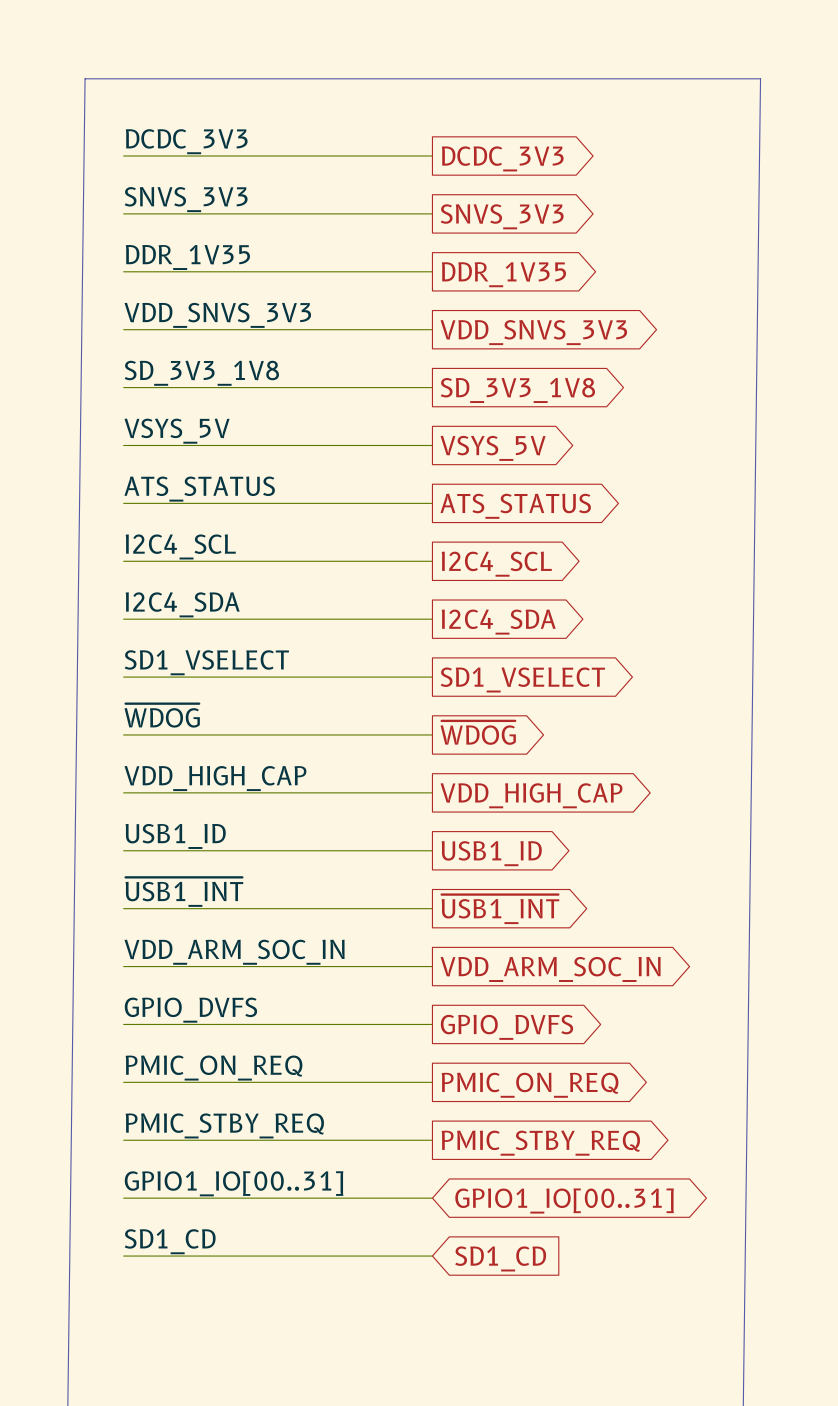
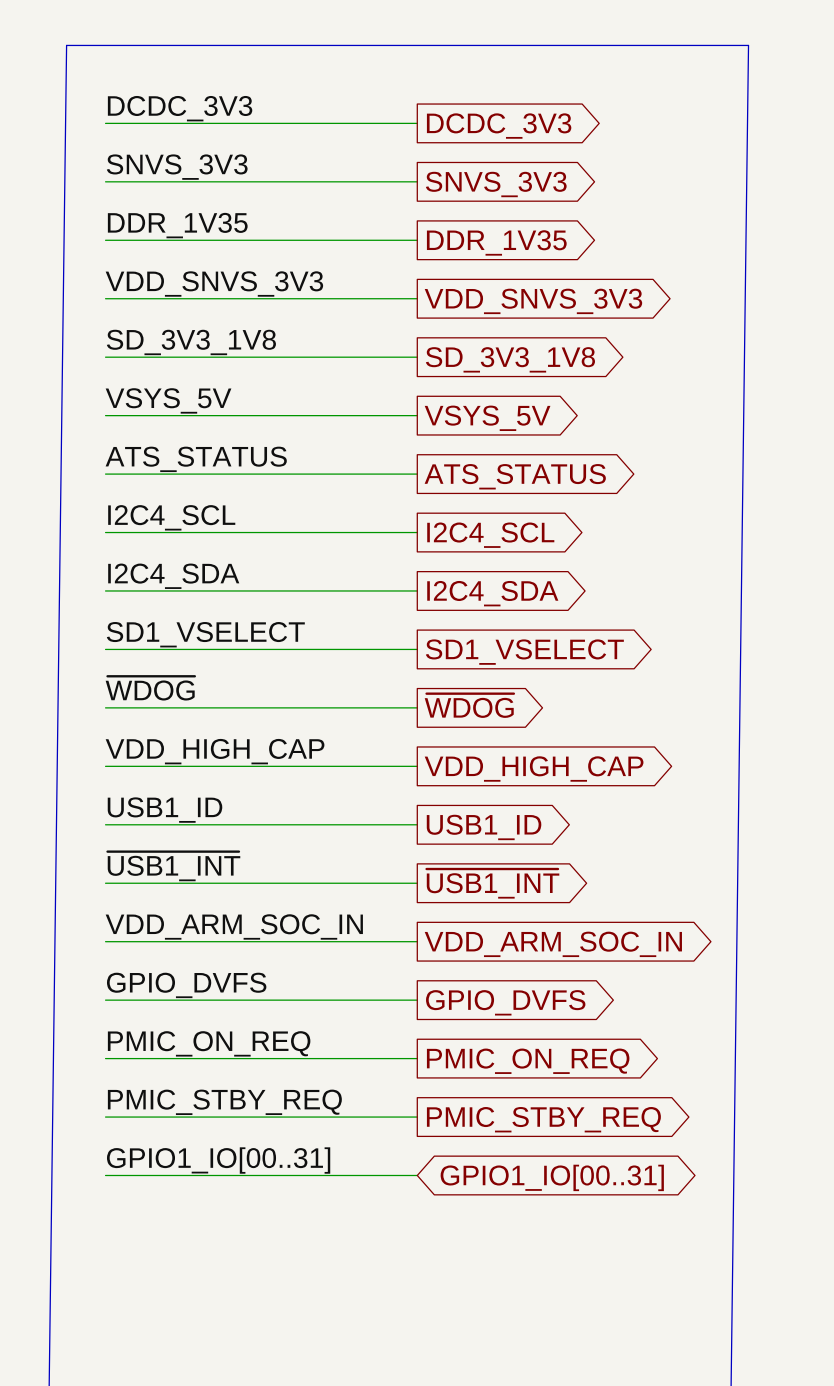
label: SD1_CD (170, 1241) -> none
wire: (123, 1256) (432, 1256) -> none
global label: SD1_CD (500, 1258) -> none

